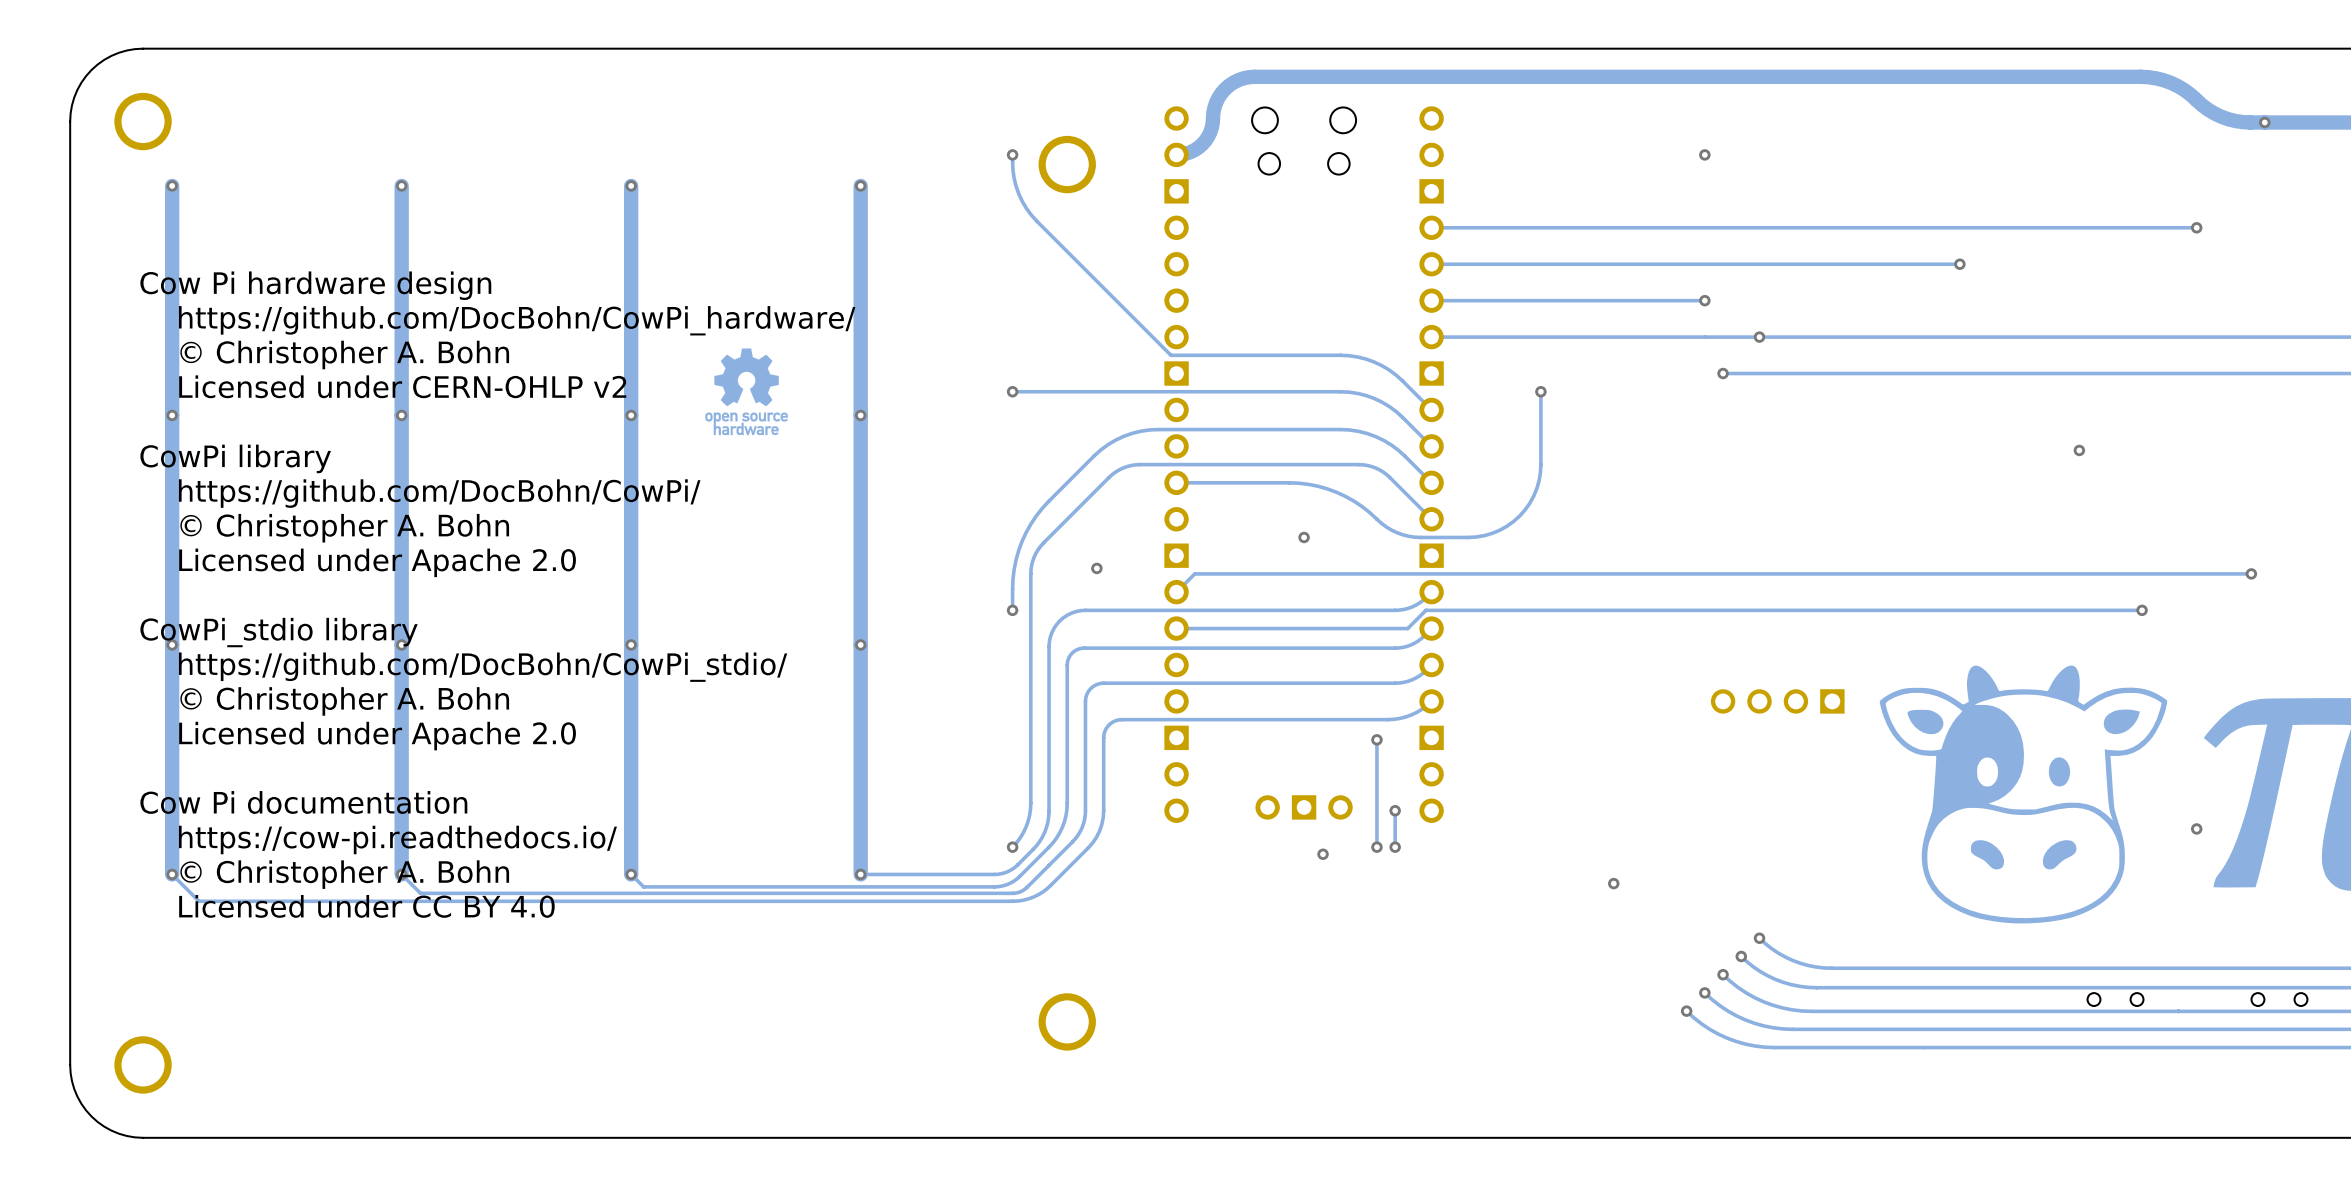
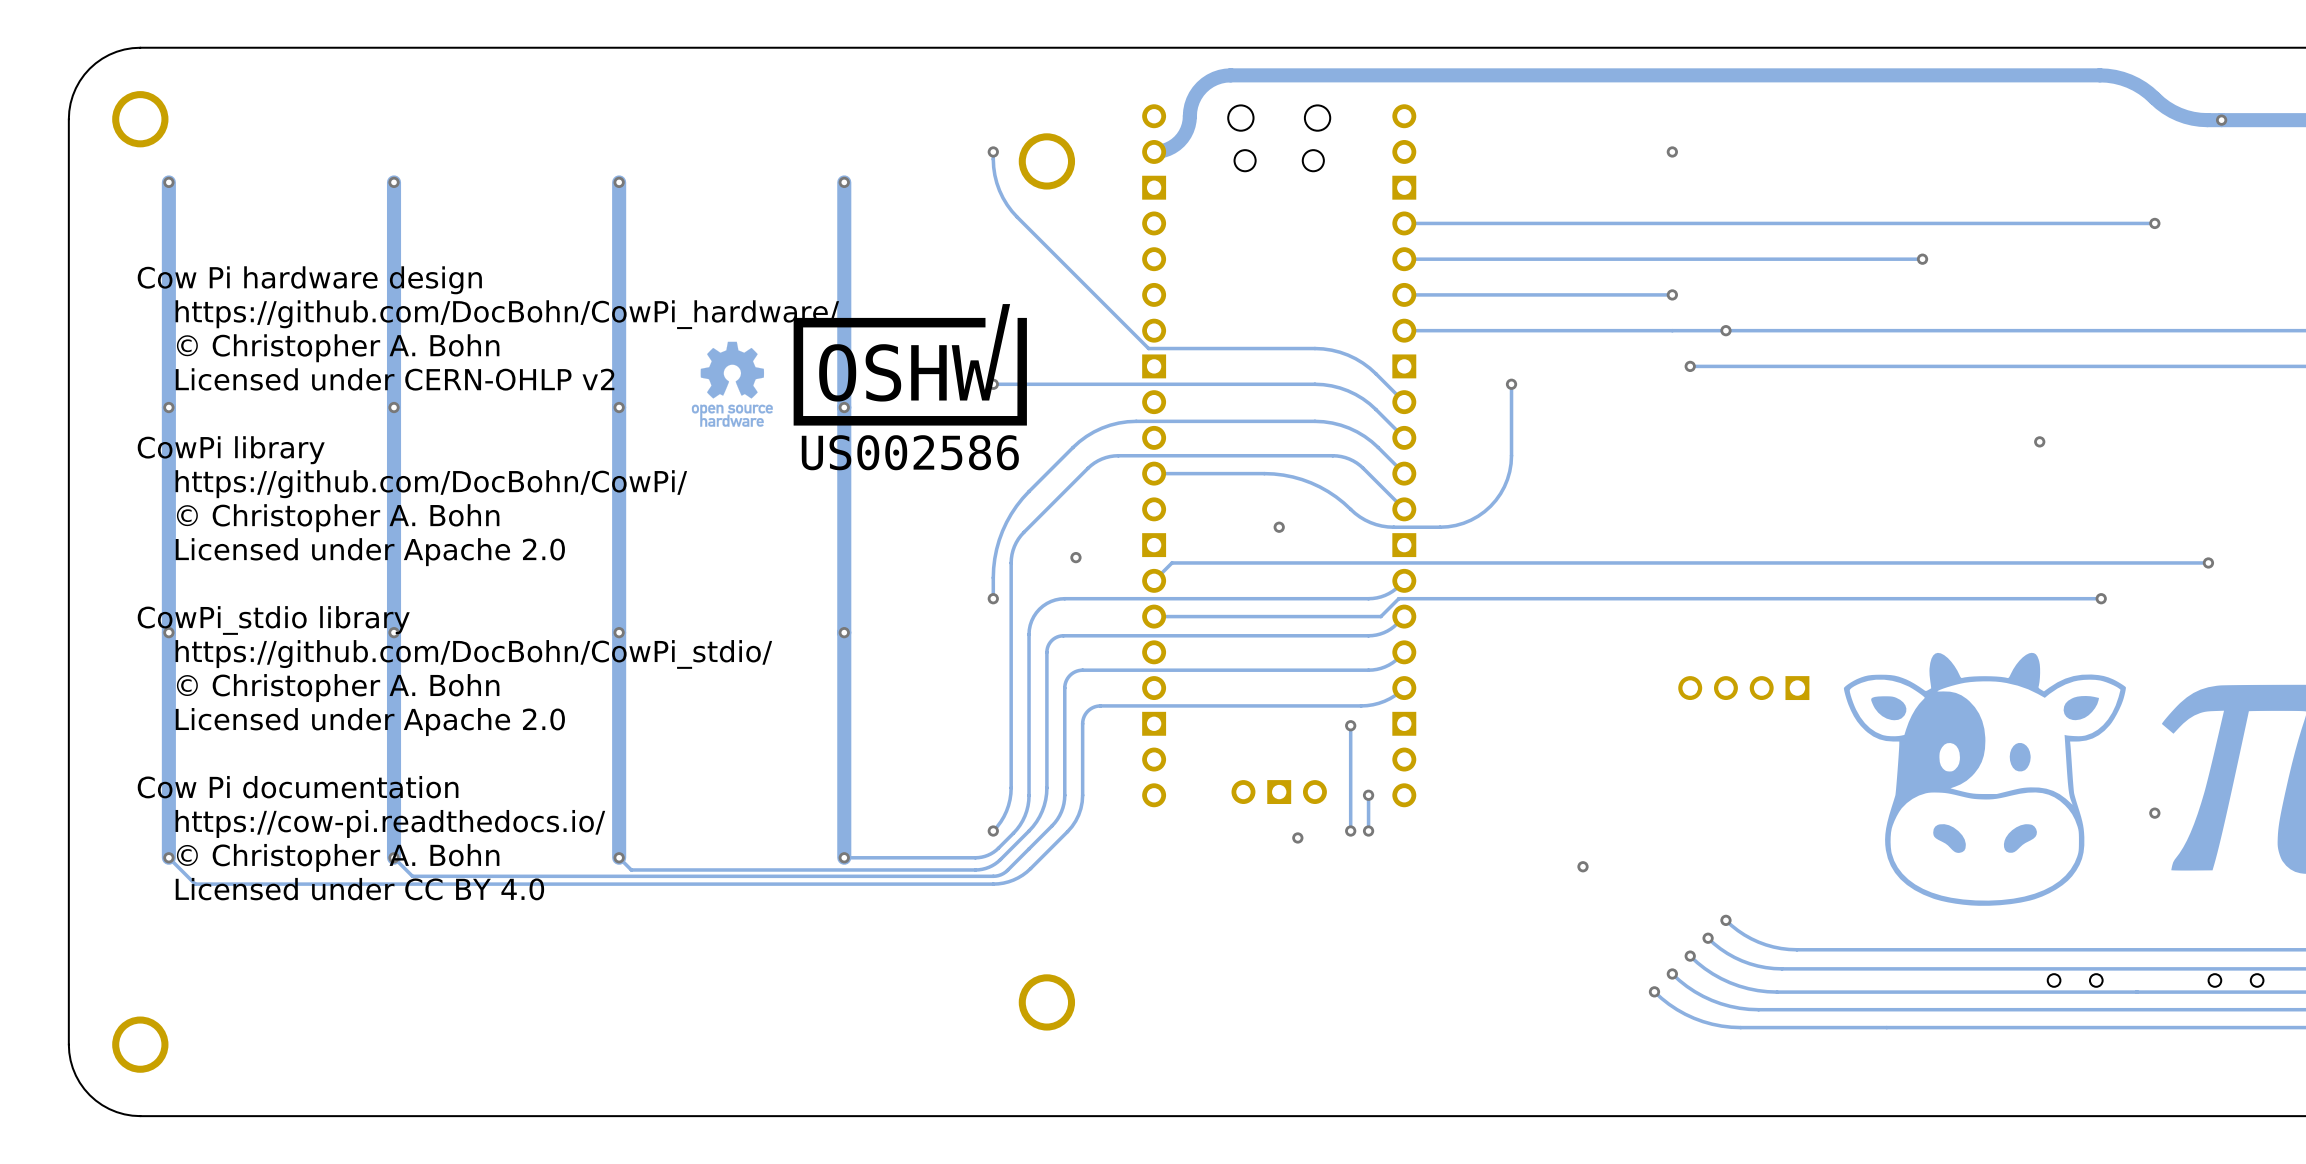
drawing: none -> [793, 304, 1027, 471]

